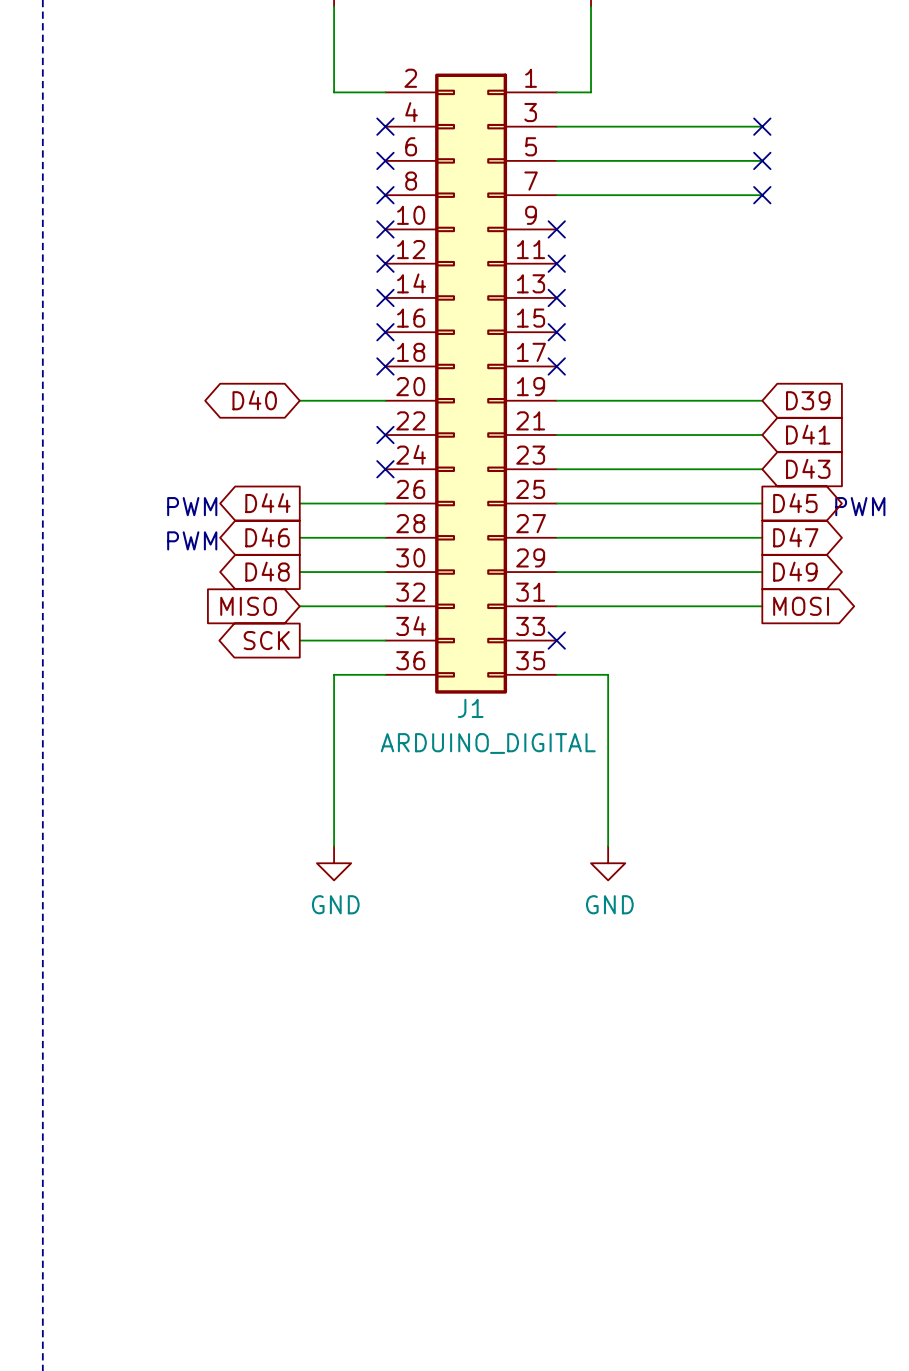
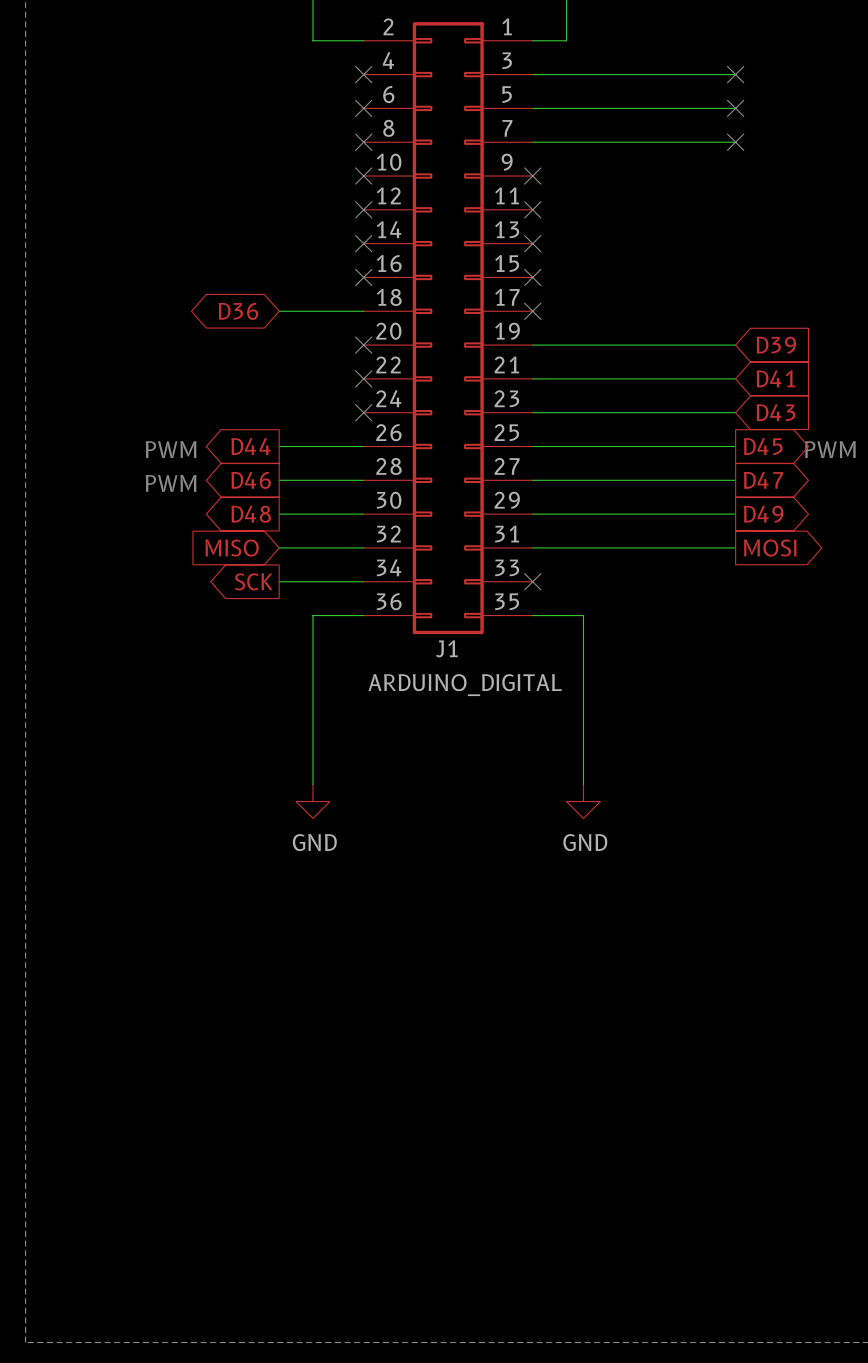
global label: none -> D36 (238, 311)
no-connect mark position: (385, 366) -> (363, 345)
global label: D40 (254, 400) -> none
wire: (299, 400) (385, 400) -> (279, 311) (363, 311)

